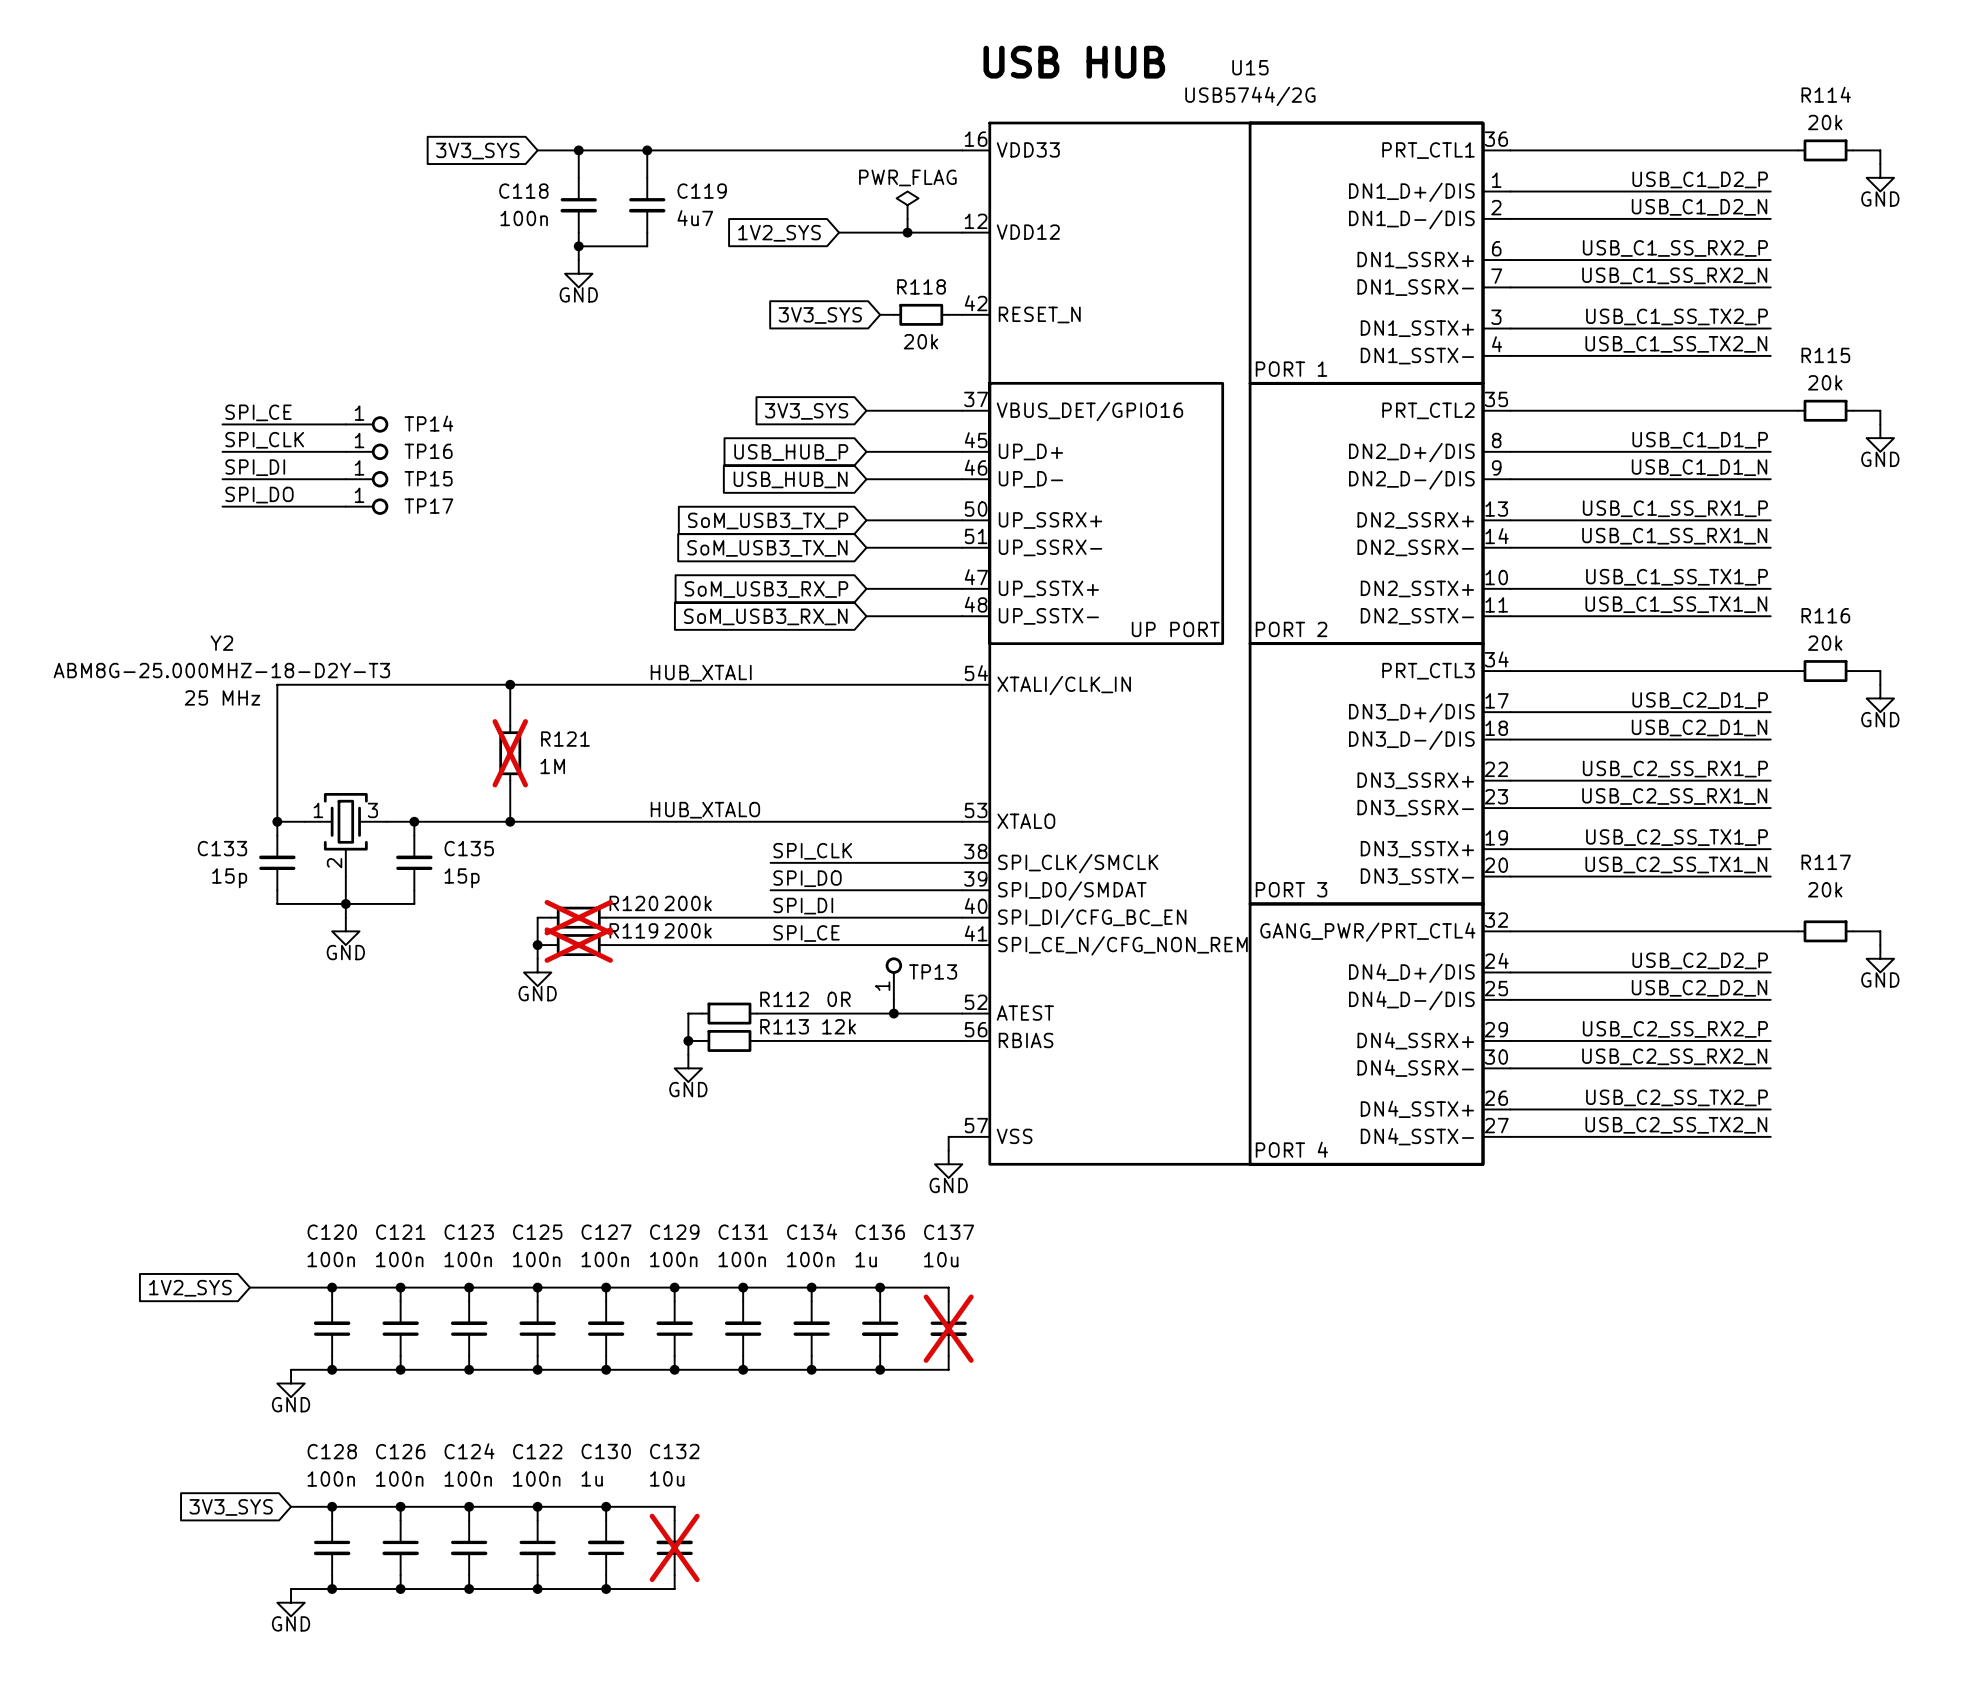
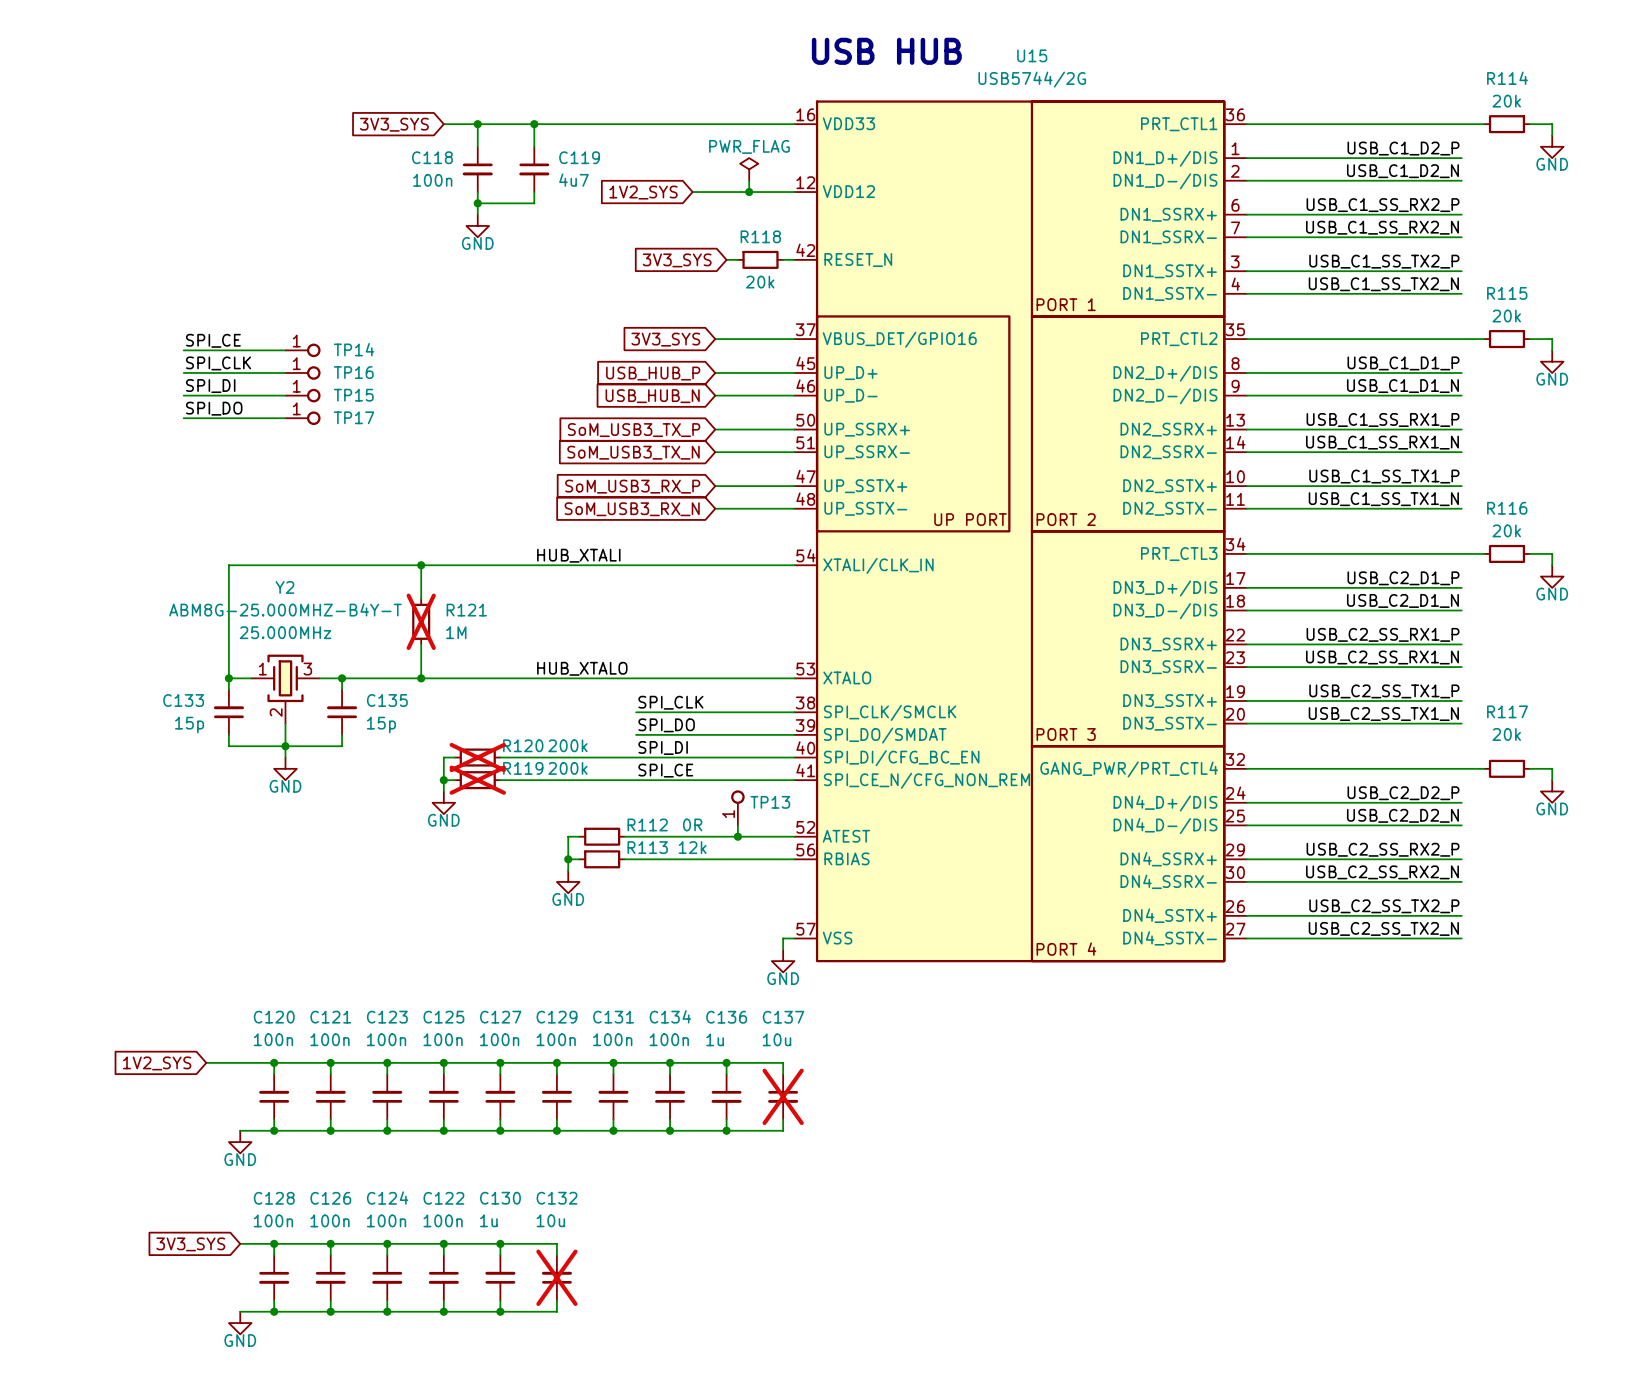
Y2 name position: Y2 (221, 643) -> Y2 (284, 587)
Y2 text: ABM8G-25.000MHZ-18-D2Y-T3 (221, 670) -> none
Y2 text: 25 MHz (222, 697) -> 25.000MHz (285, 632)
Y2 value: none -> ABM8G-25.000MHZ-B4Y-T (285, 609)

